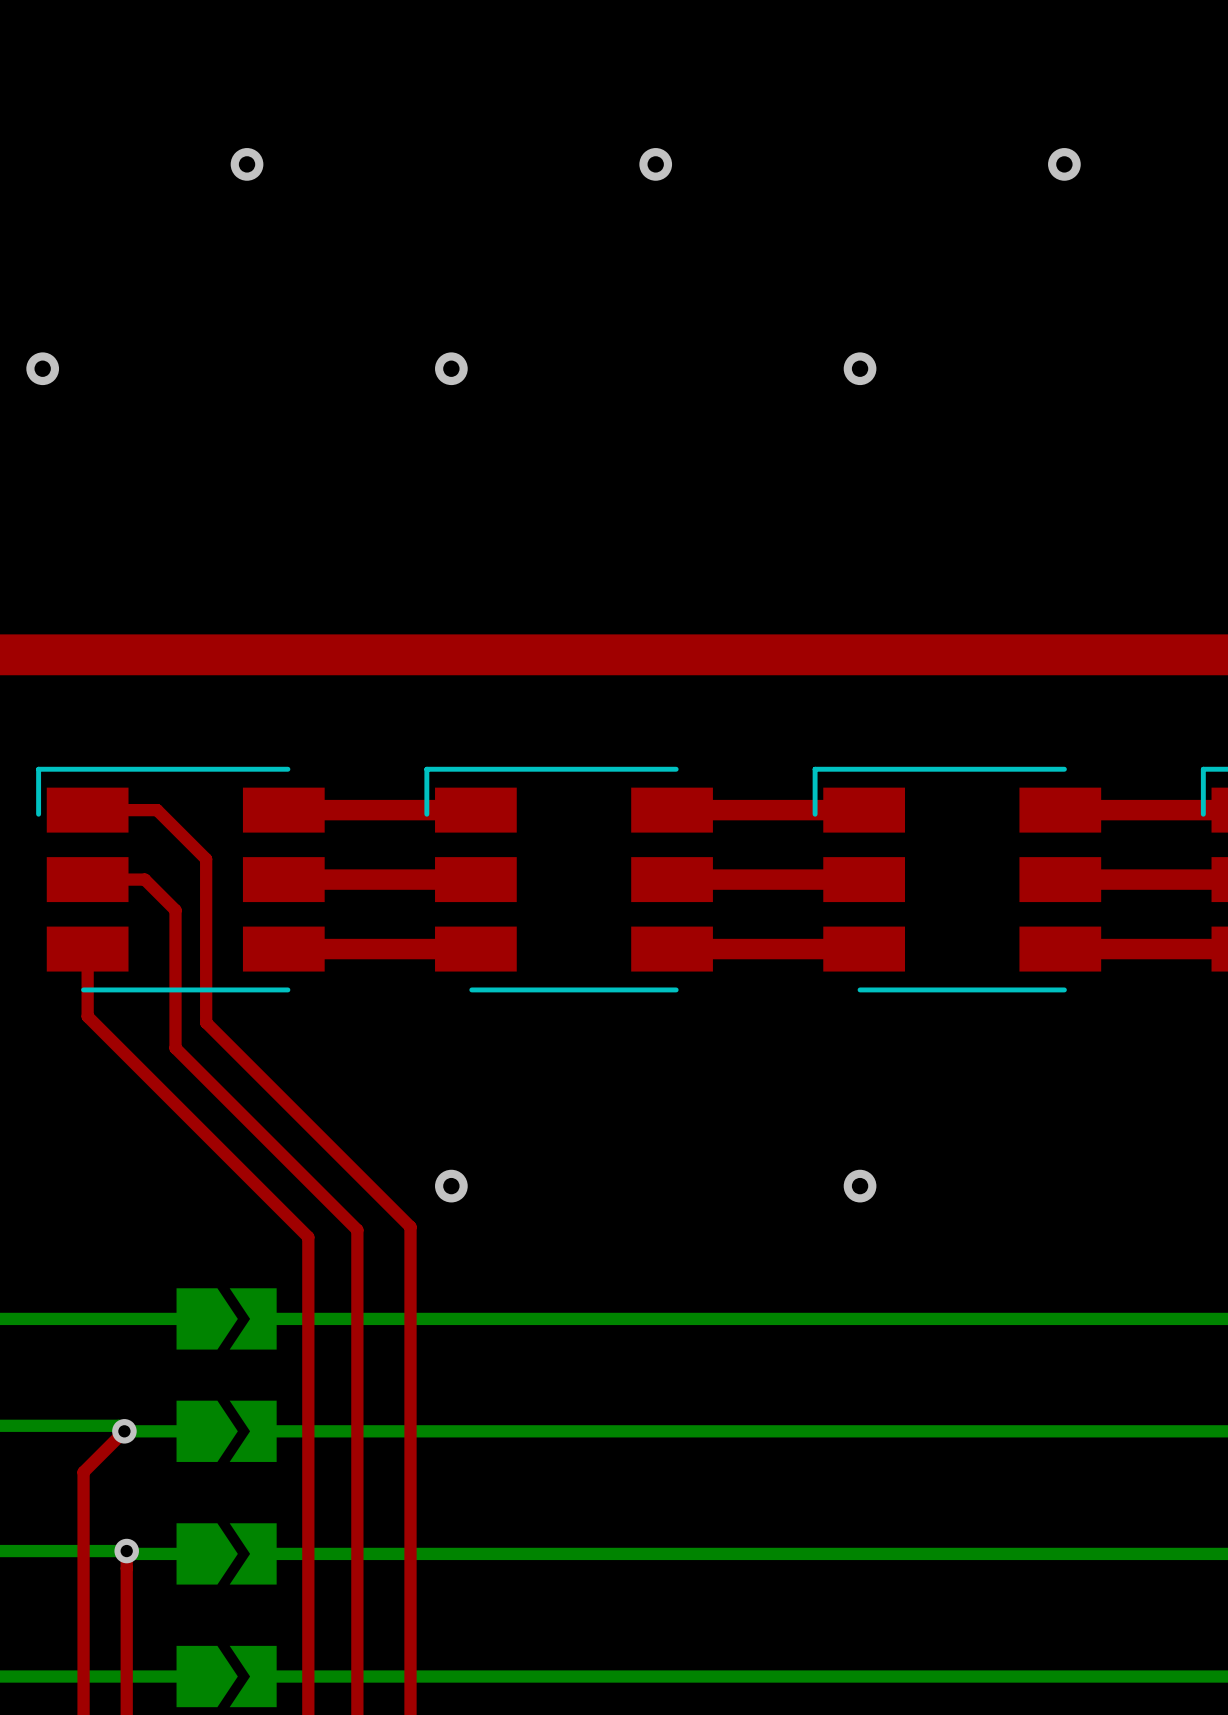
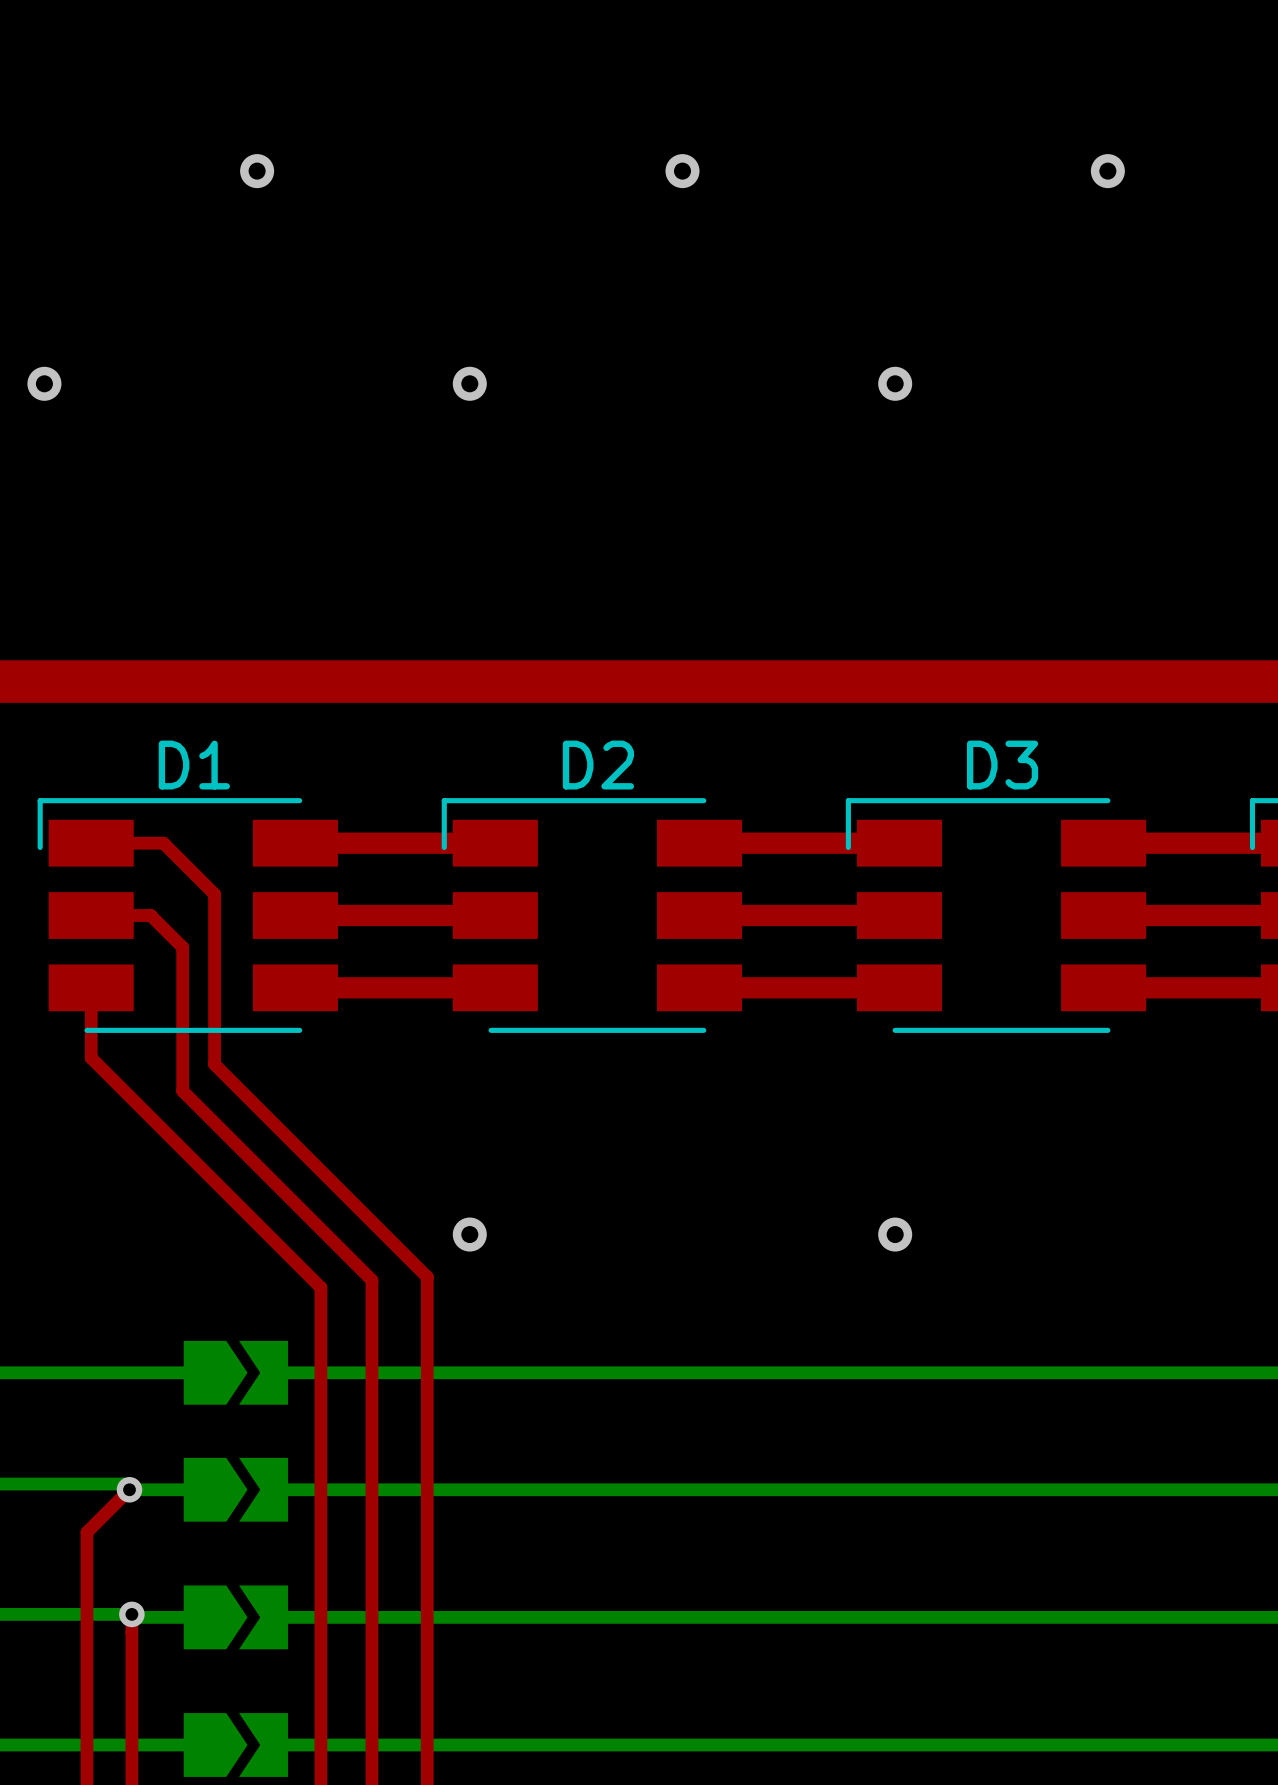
D1 name: none -> D1 (194, 765)
D2 name: none -> D2 (598, 765)
D3 name: none -> D3 (1002, 765)

